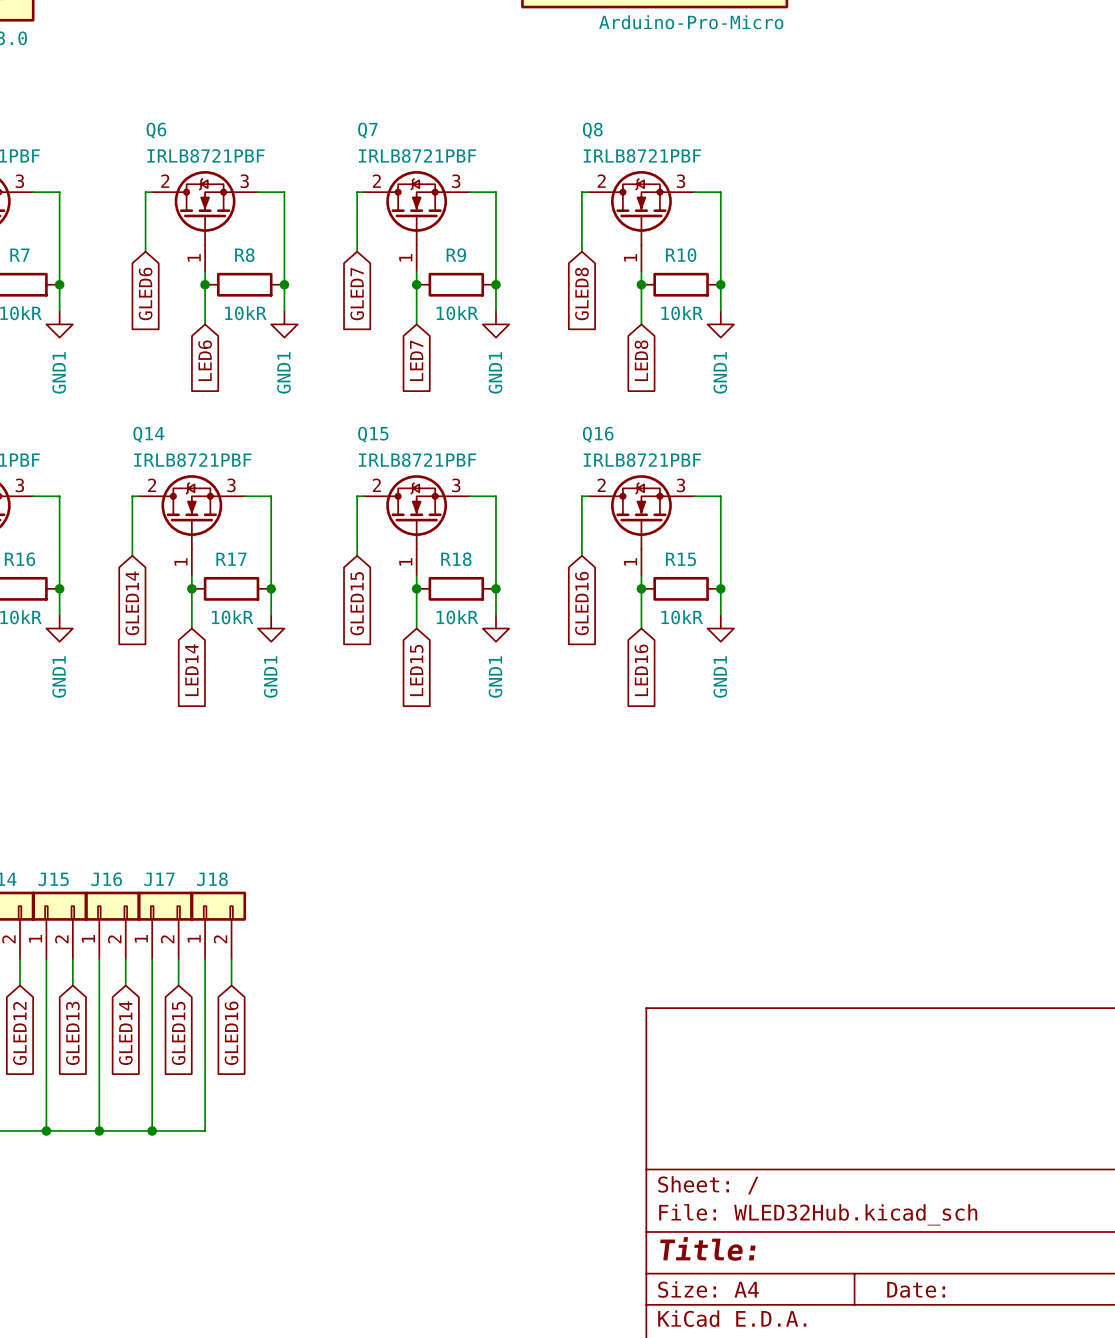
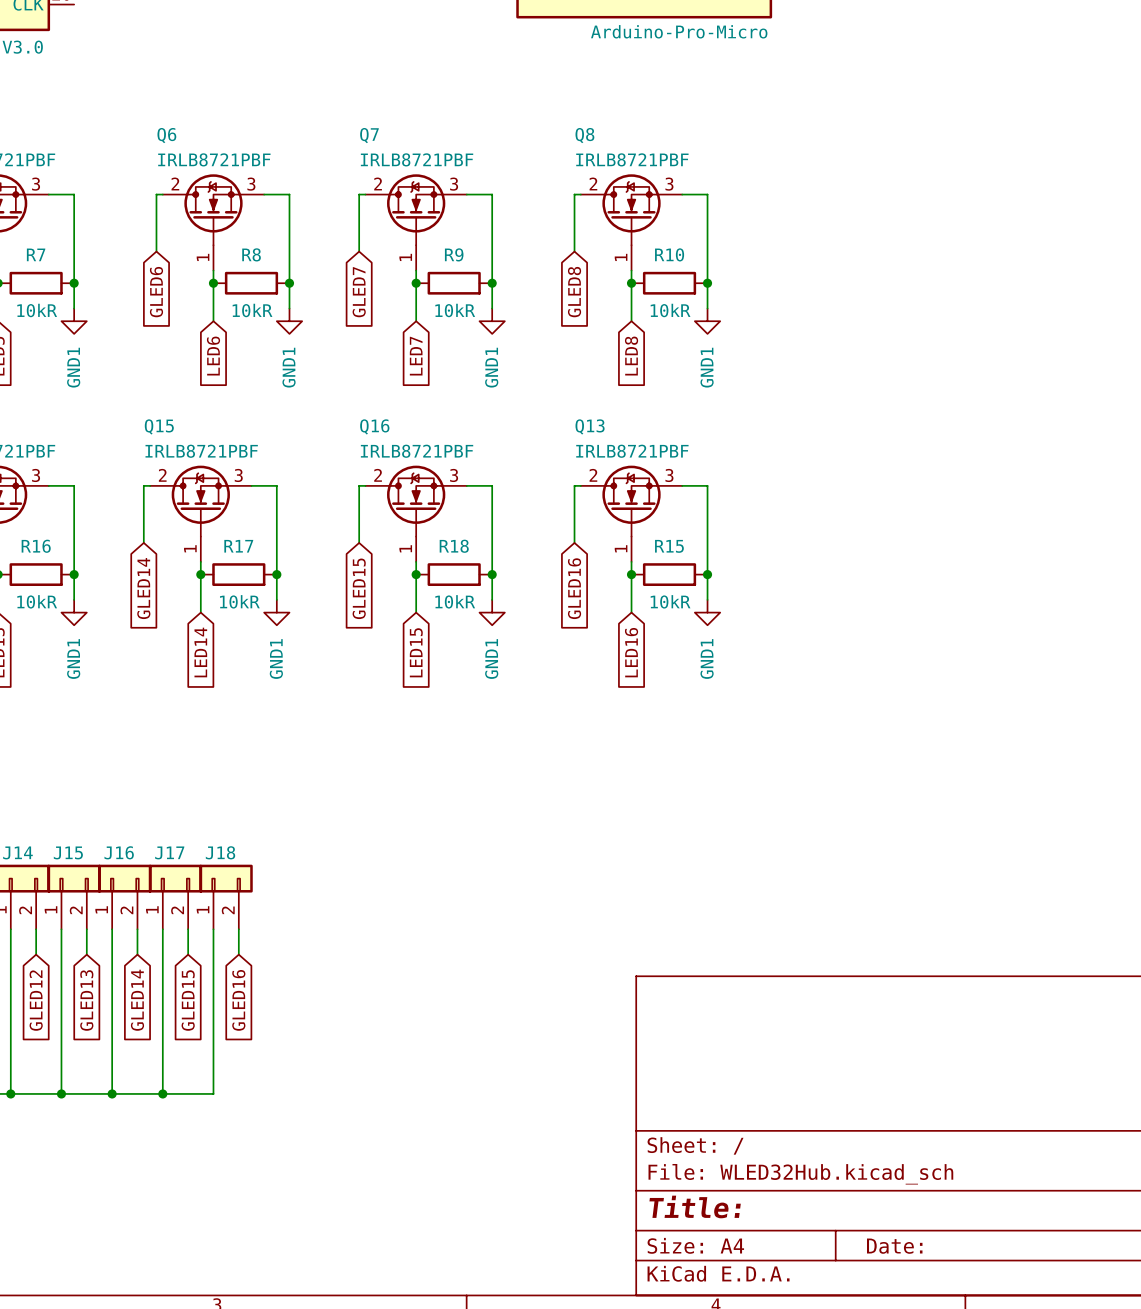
Q14 name: Q14 (148, 434) -> Q15 (159, 426)
Q15 name: Q15 (373, 434) -> Q16 (374, 426)
Q16 name: Q16 (598, 434) -> Q13 (590, 426)

